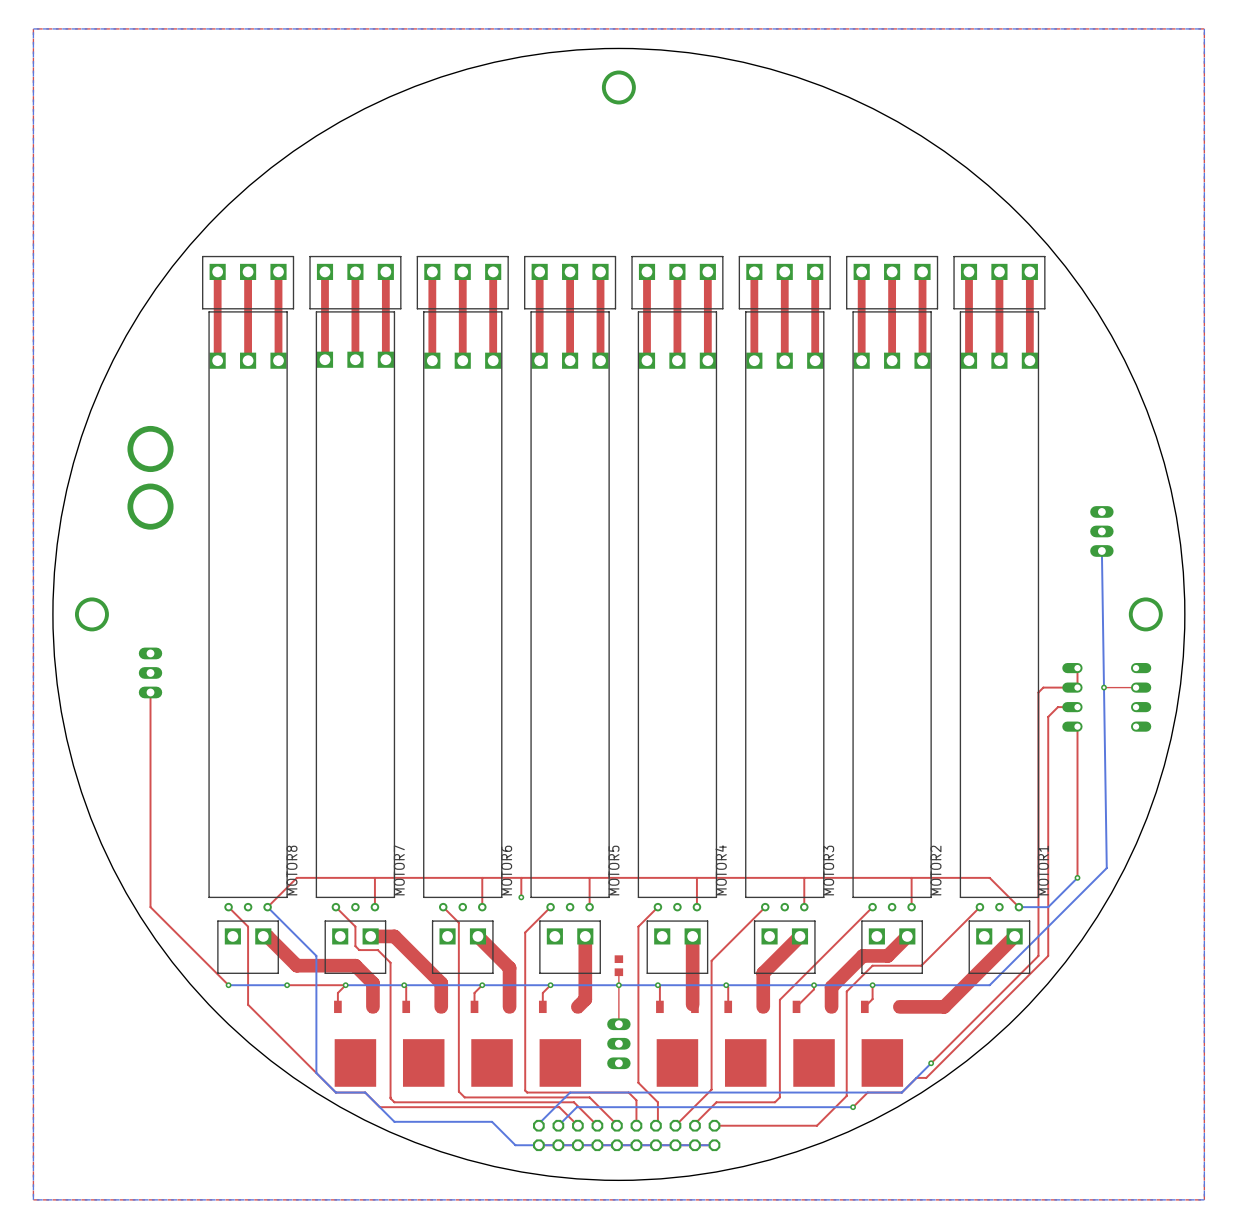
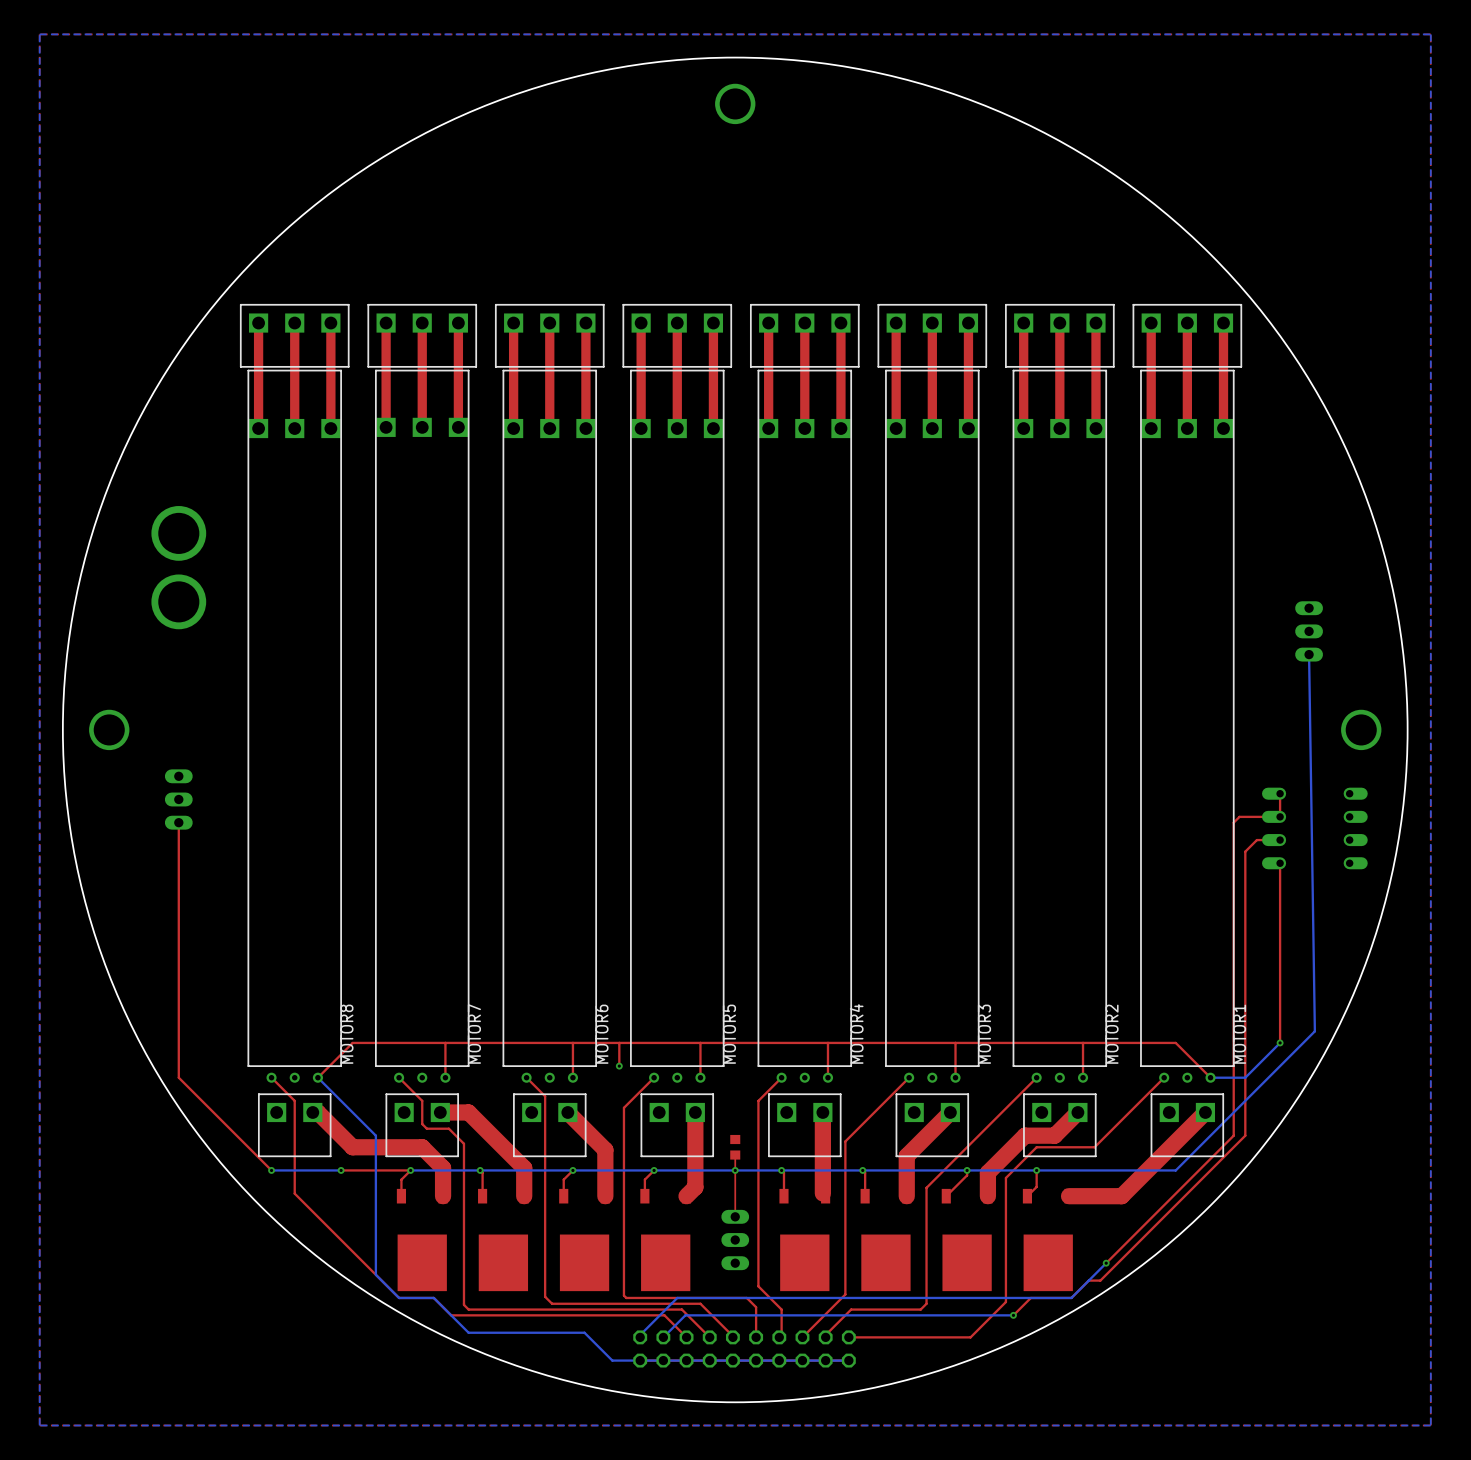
via: (1103, 687) -> none
top track: (1136, 687) (1104, 687) -> none

